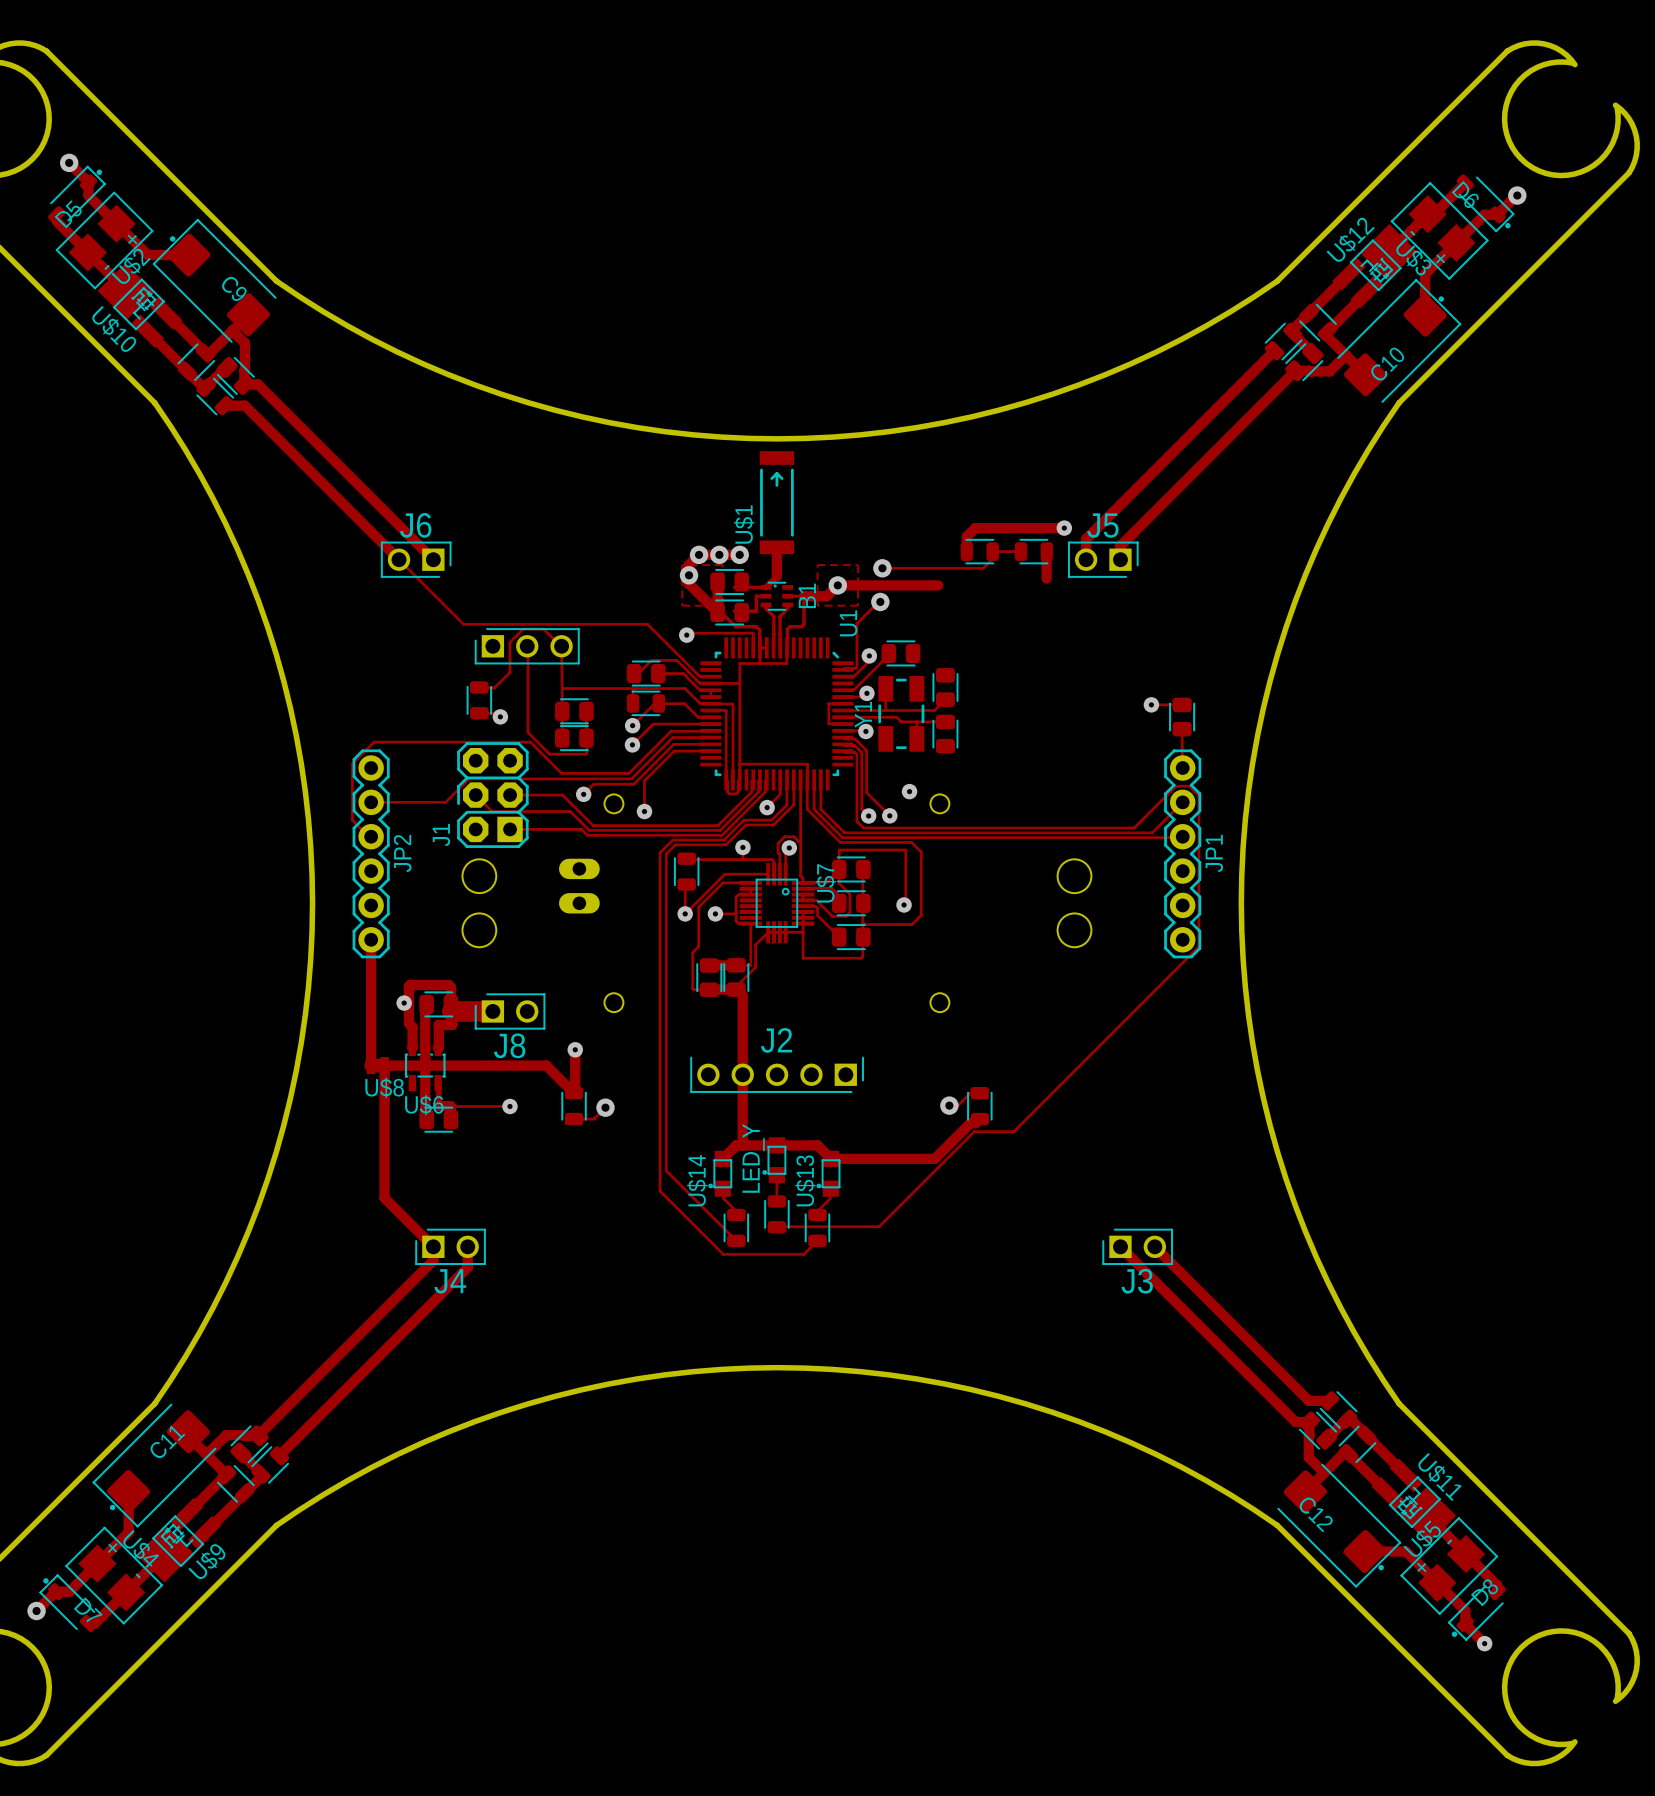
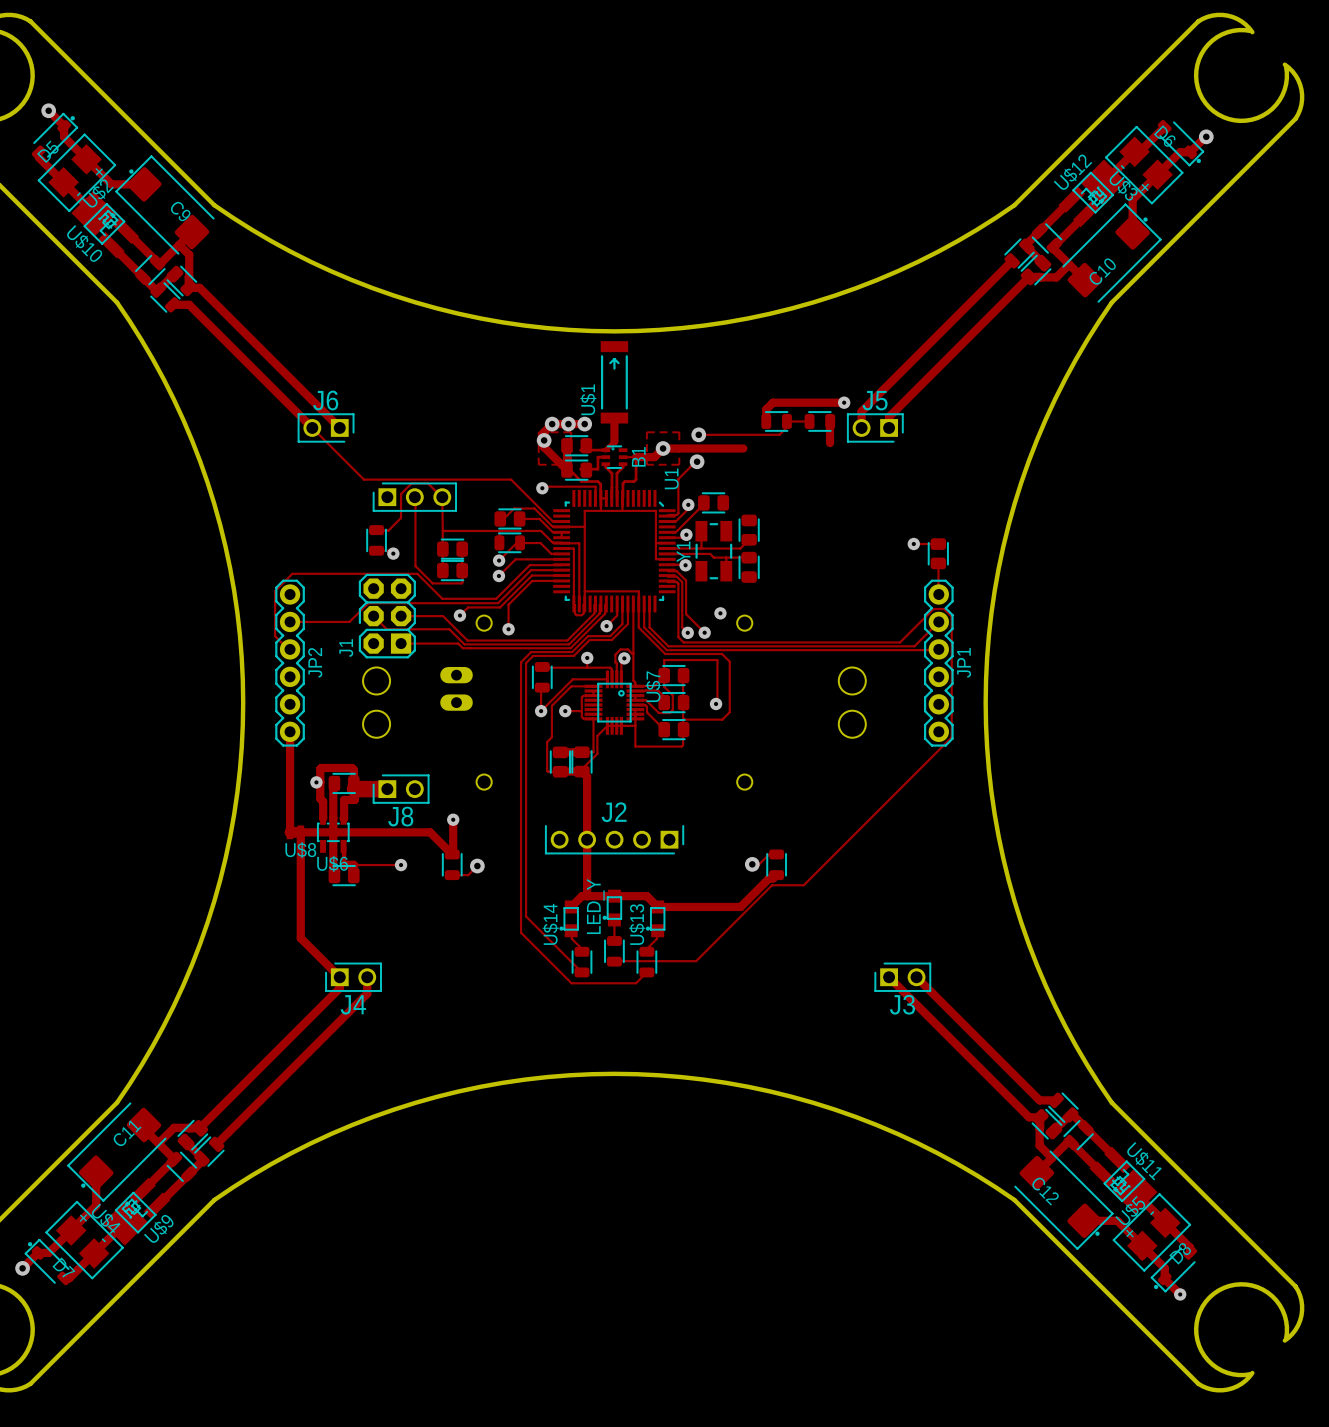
track: none -> (622, 510) (655, 510) (655, 543)

